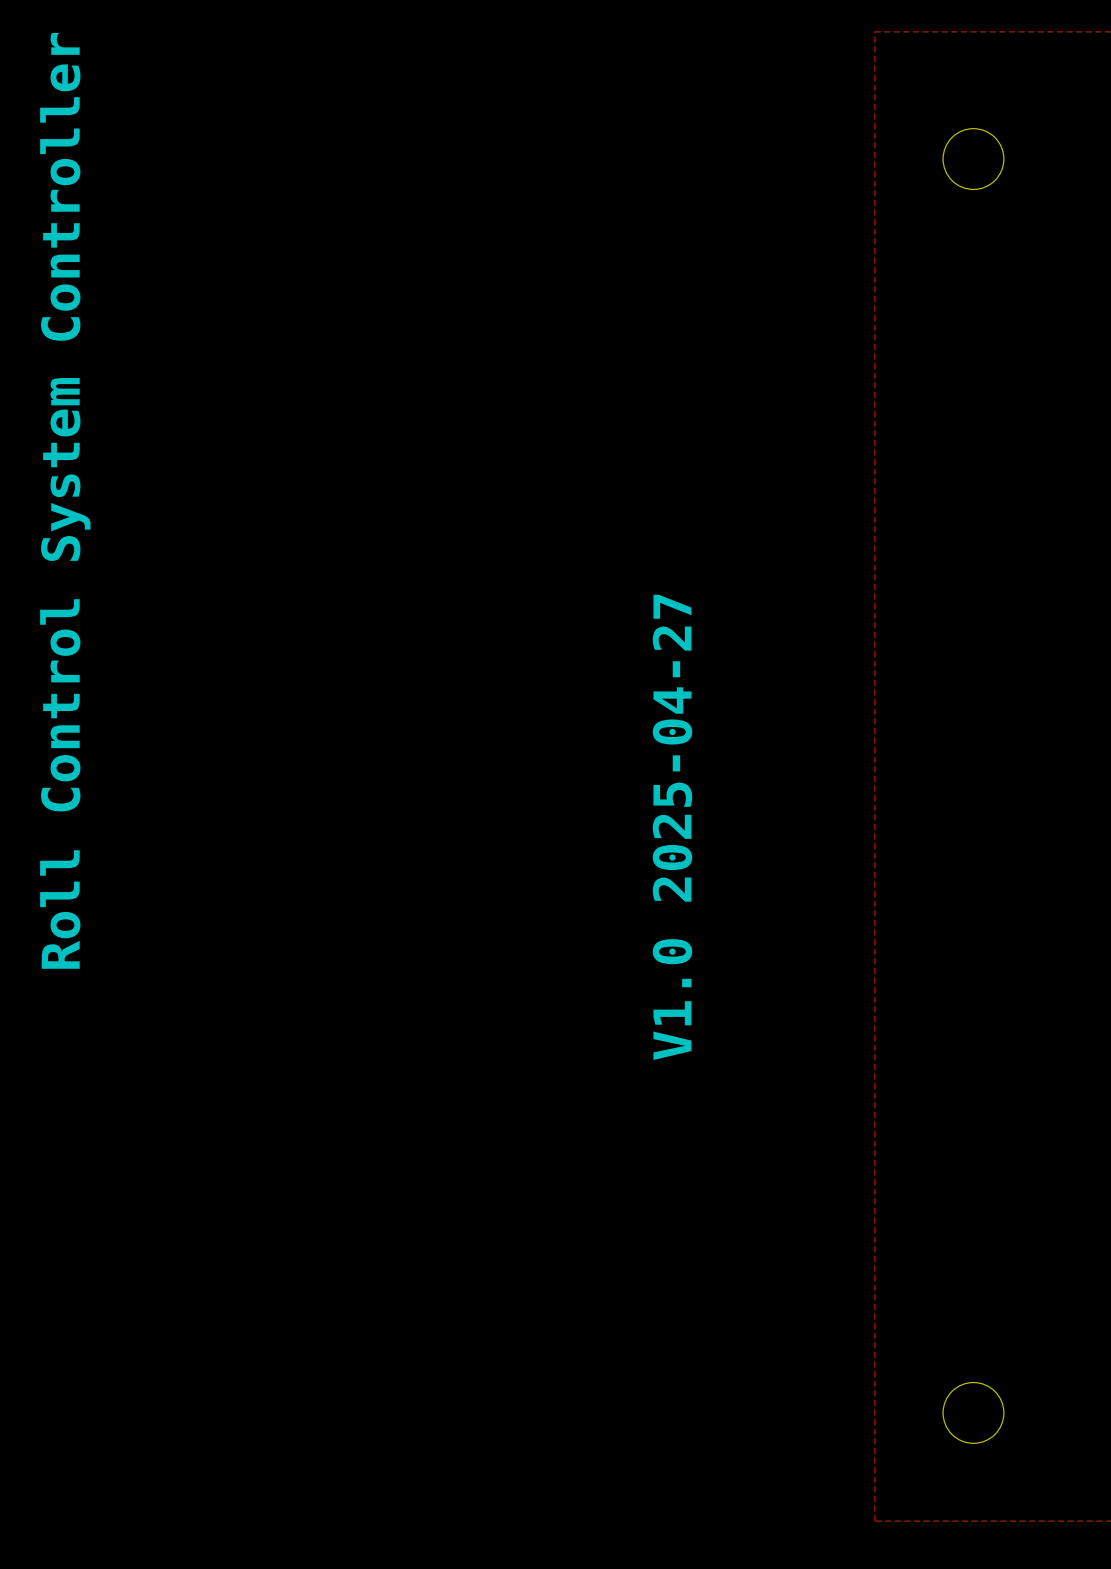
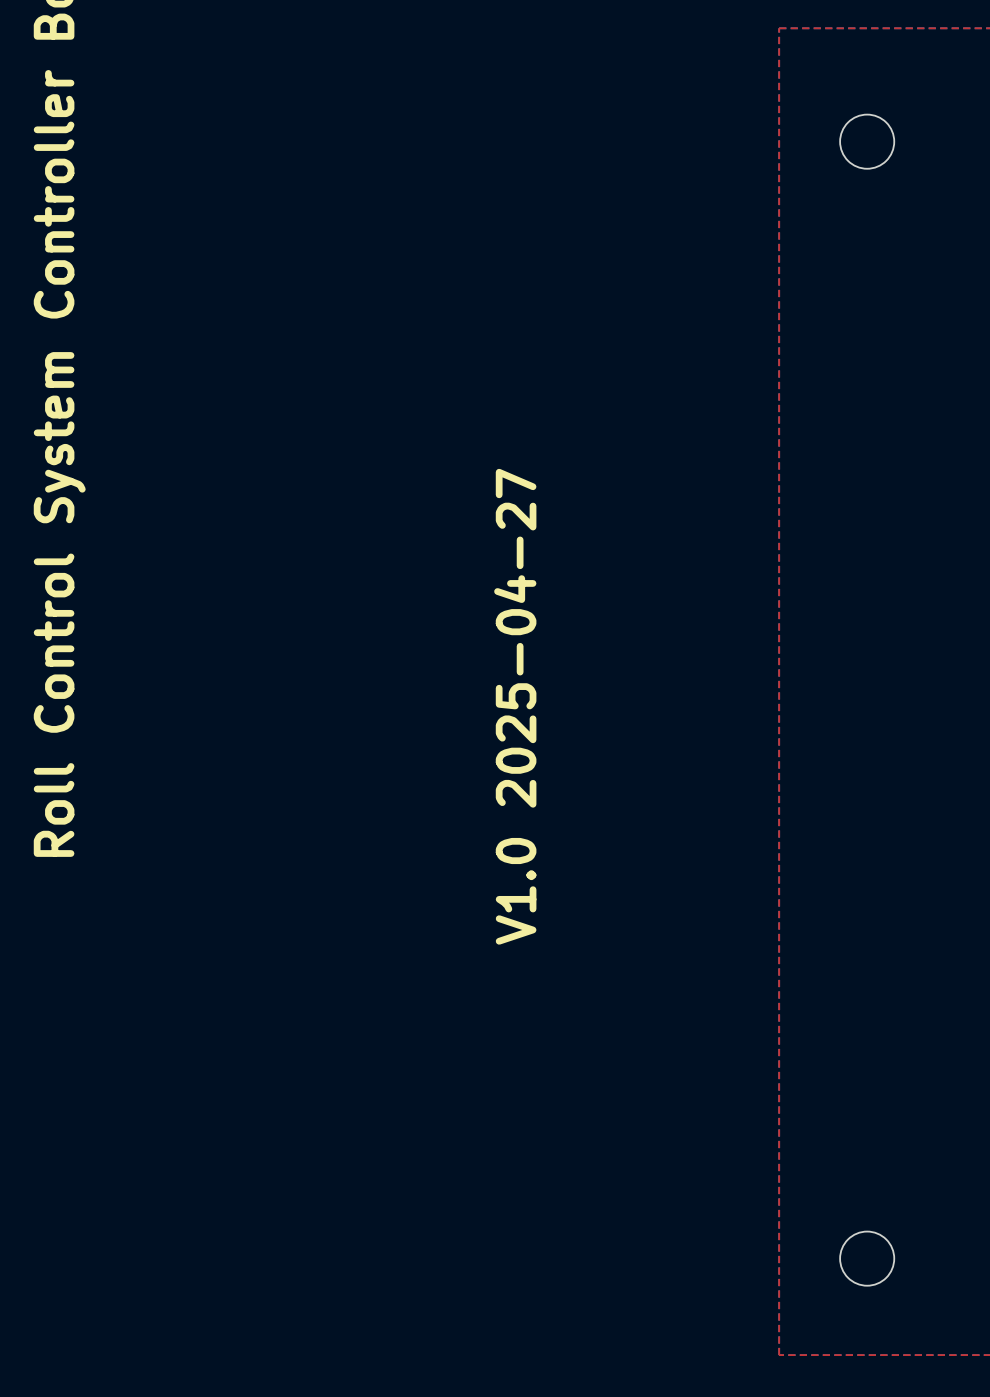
text position: V1.0 2025-04-27 (672, 827) -> V1.0 2025-04-27 (515, 706)

